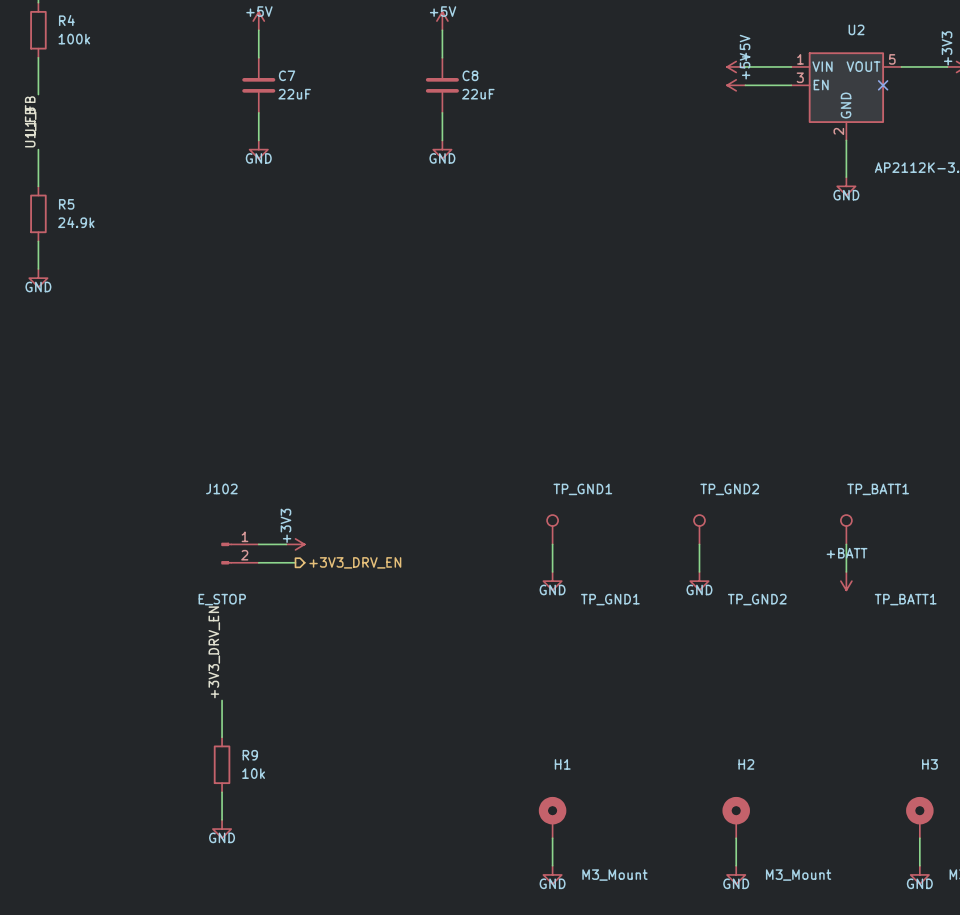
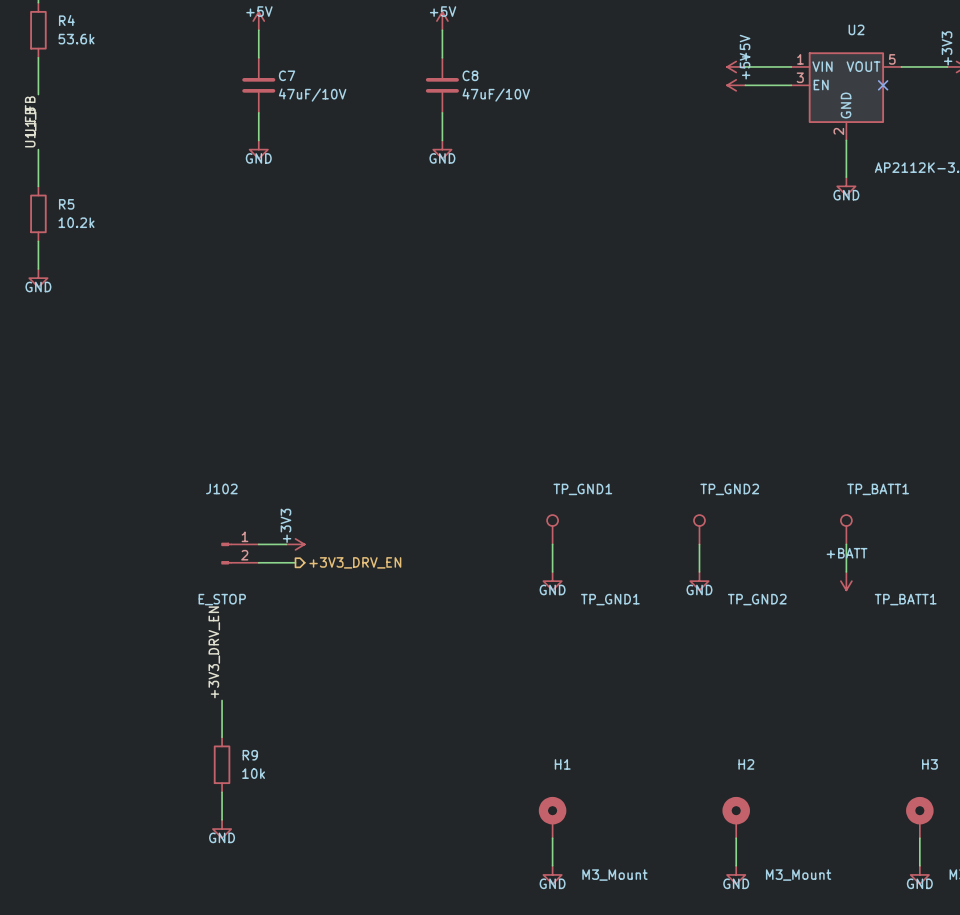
R4 value: 100k (74, 39) -> 53.6k (76, 39)
C7 value: 22uF (294, 94) -> 47uF/10V (312, 95)
C8 value: 22uF (478, 94) -> 47uF/10V (496, 95)
R5 value: 24.9k (76, 222) -> 10.2k (76, 222)

